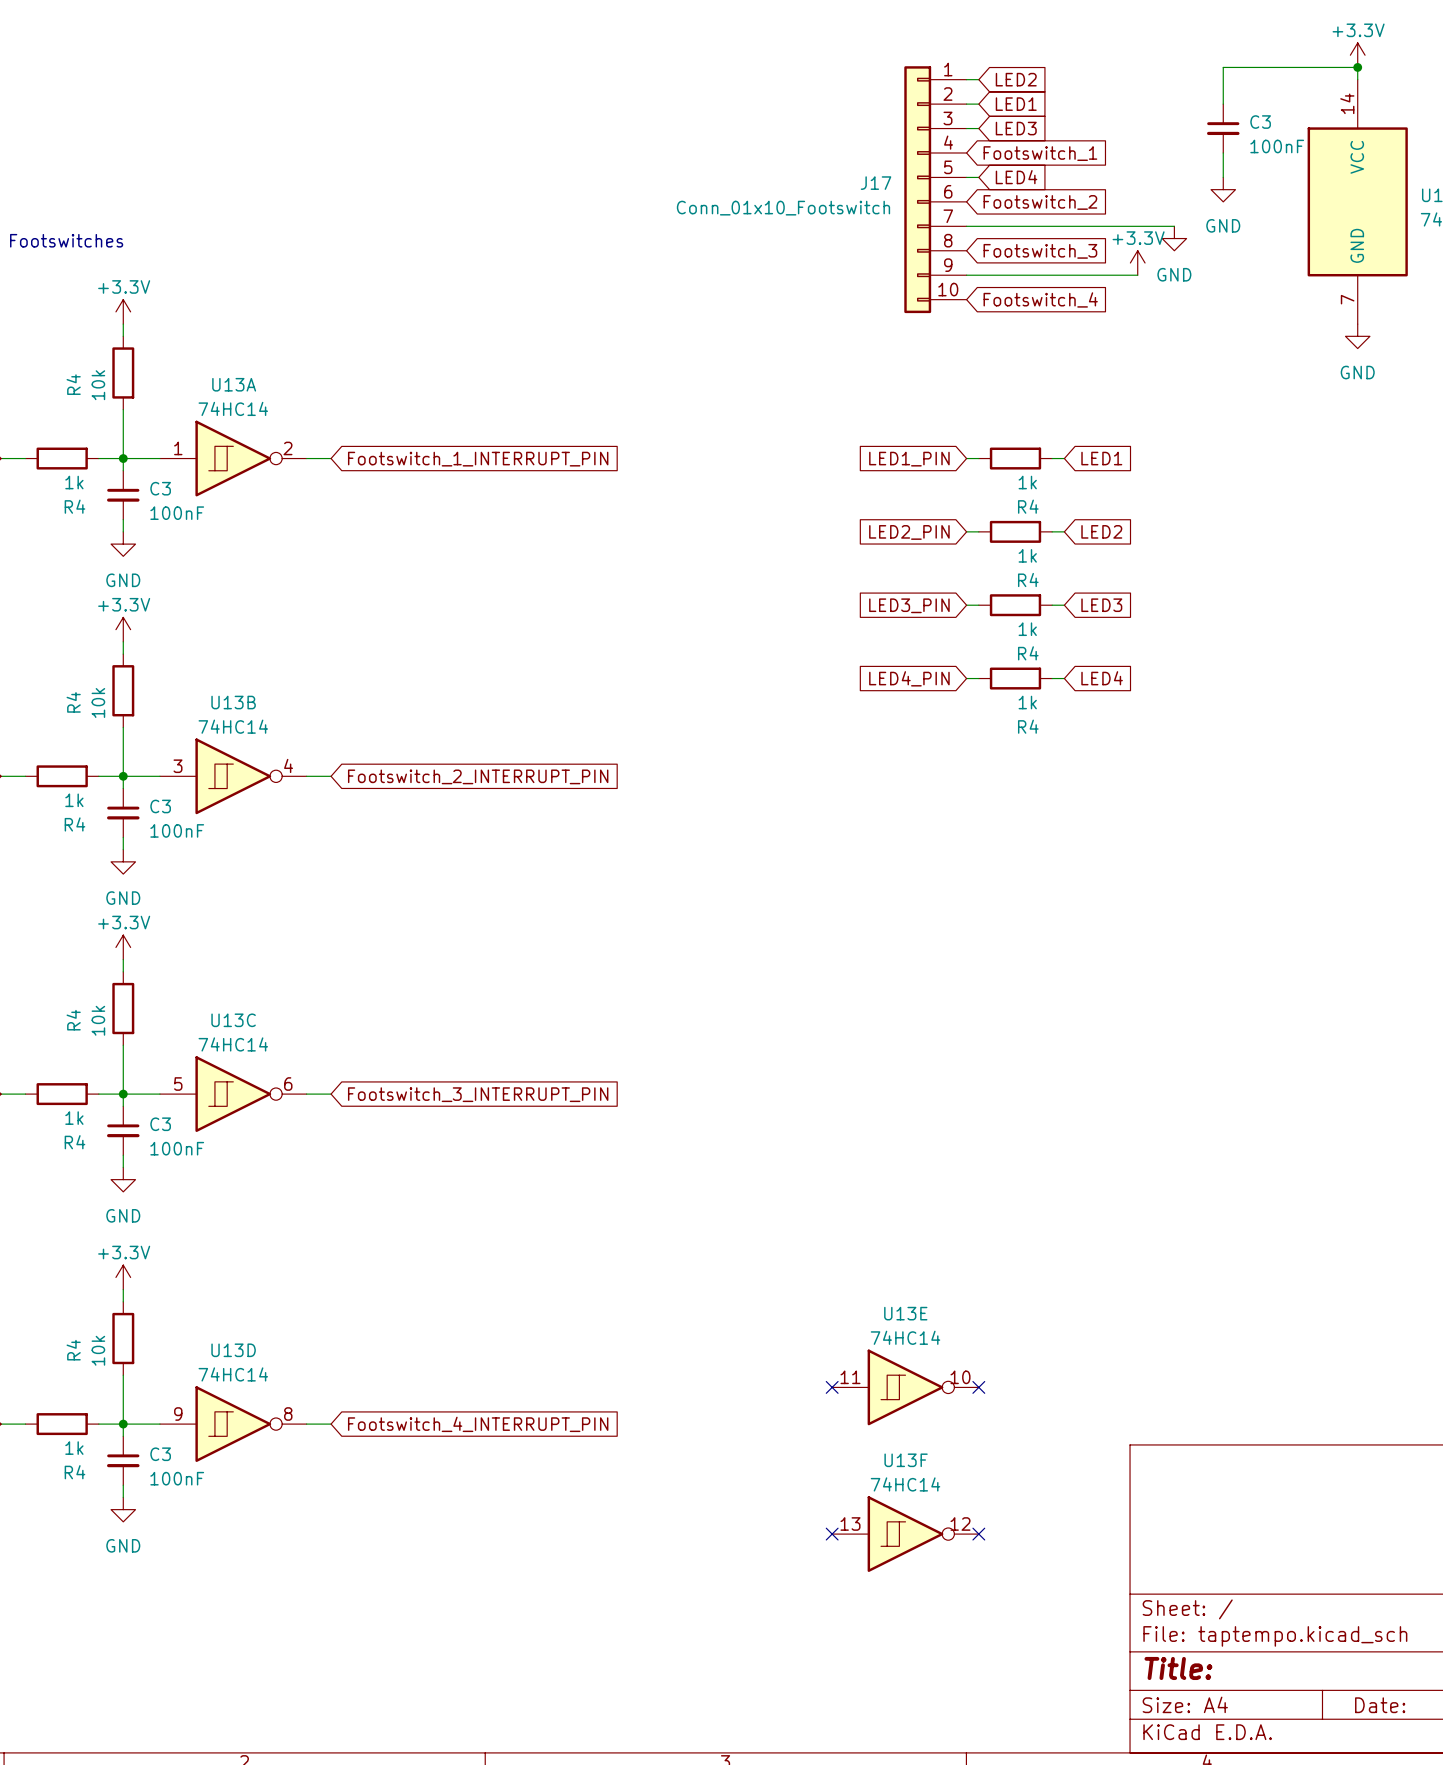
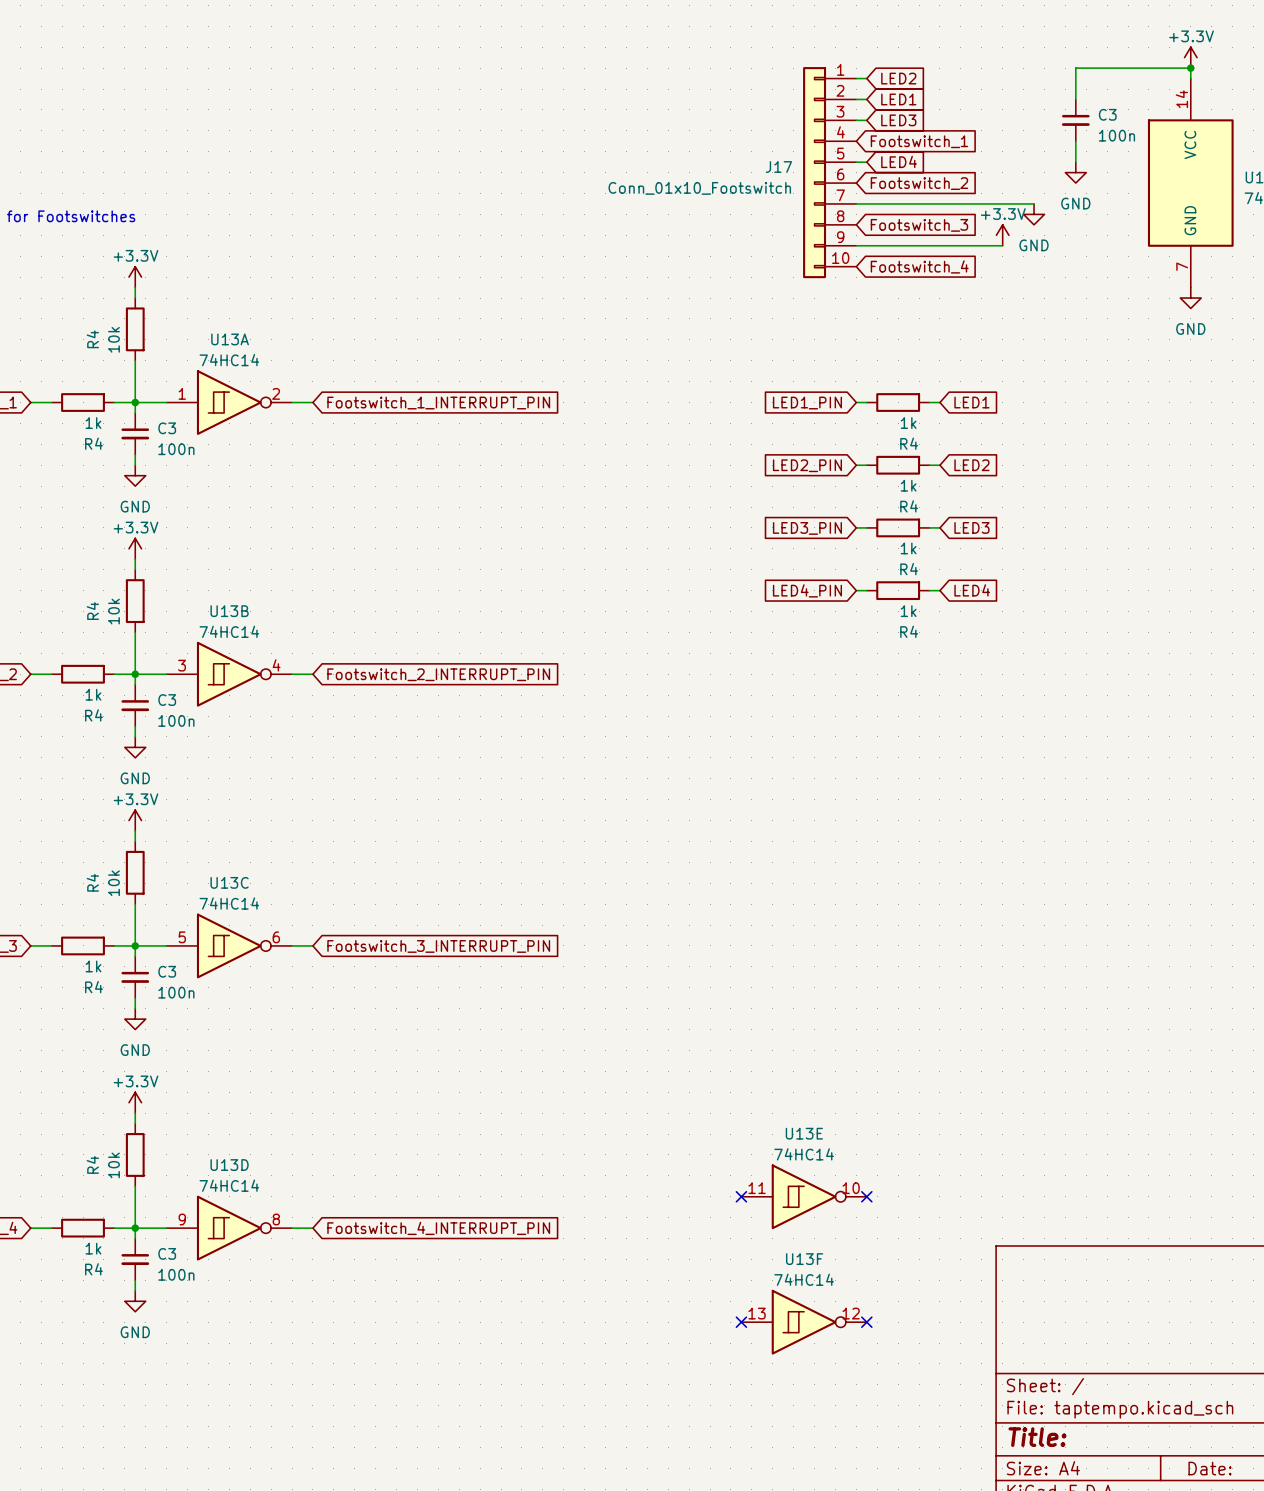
C3 value: 100nF (1277, 146) -> 100n (1116, 135)
C3 value: 100nF (177, 513) -> 100n (176, 449)
C3 value: 100nF (177, 830) -> 100n (176, 720)
C3 value: 100nF (177, 1148) -> 100n (176, 992)
C3 value: 100nF (177, 1478) -> 100n (176, 1274)

